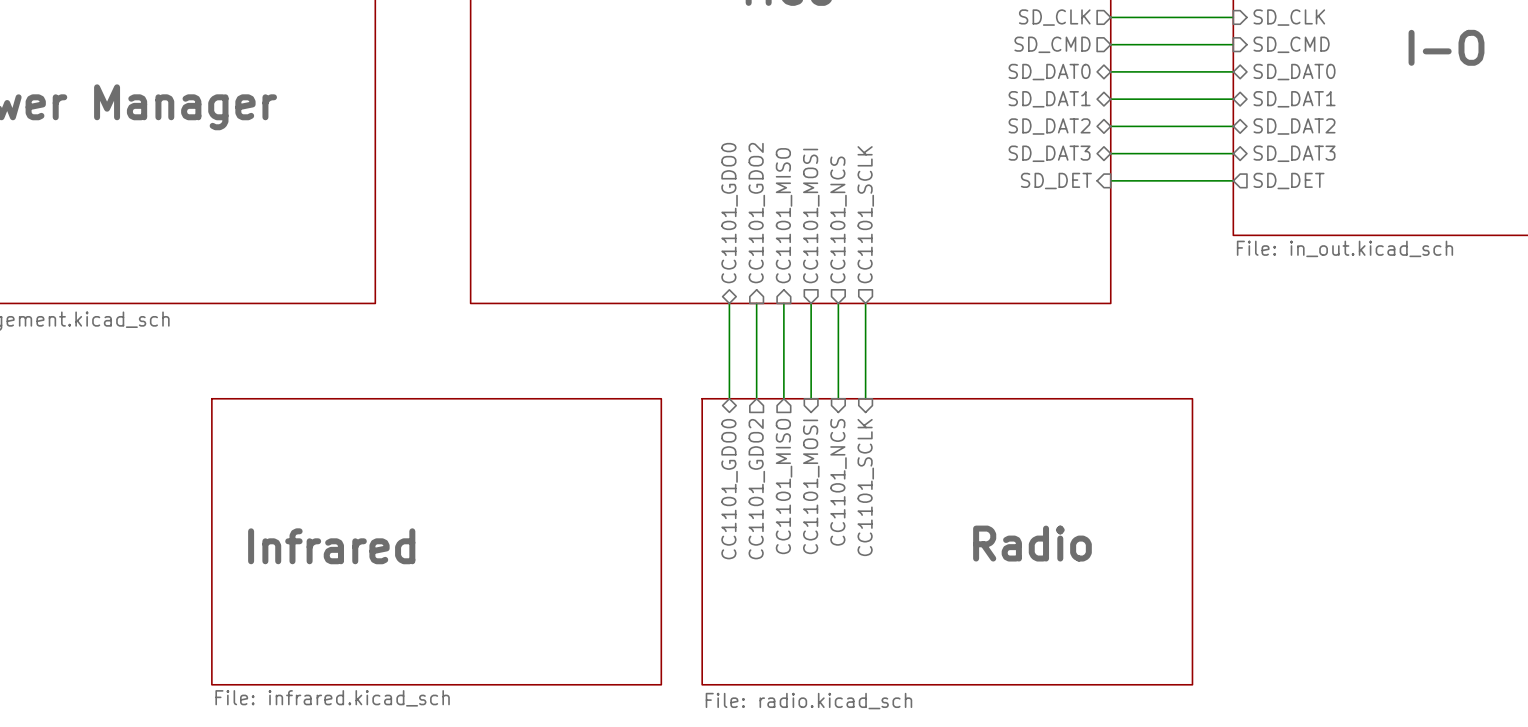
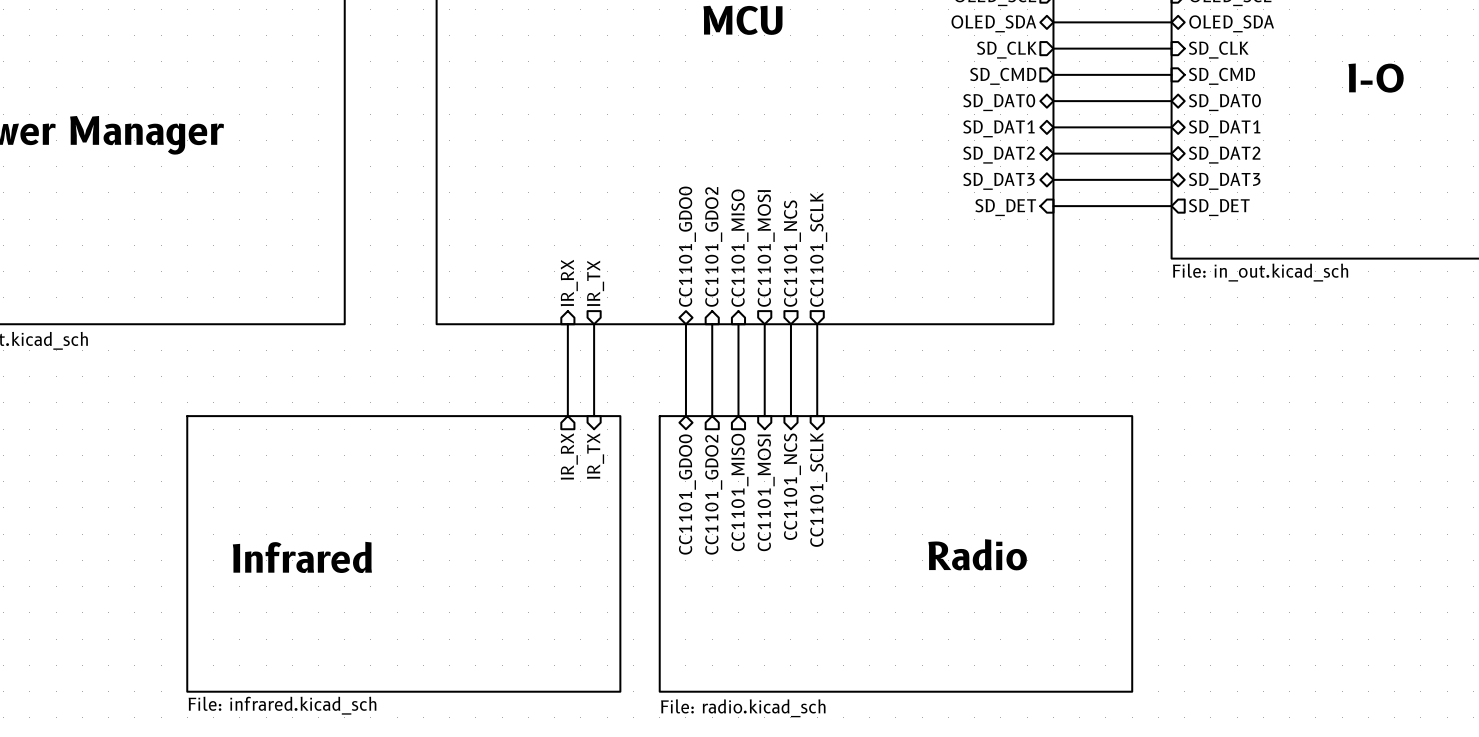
sheet pin: none -> IR_RX (569, 282)
sheet pin: none -> IR_TX (595, 283)
wire: none -> (567, 324) (567, 416)
wire: none -> (594, 324) (594, 416)
sheet pin: none -> IR_TX (595, 456)
sheet pin: none -> IR_RX (569, 456)

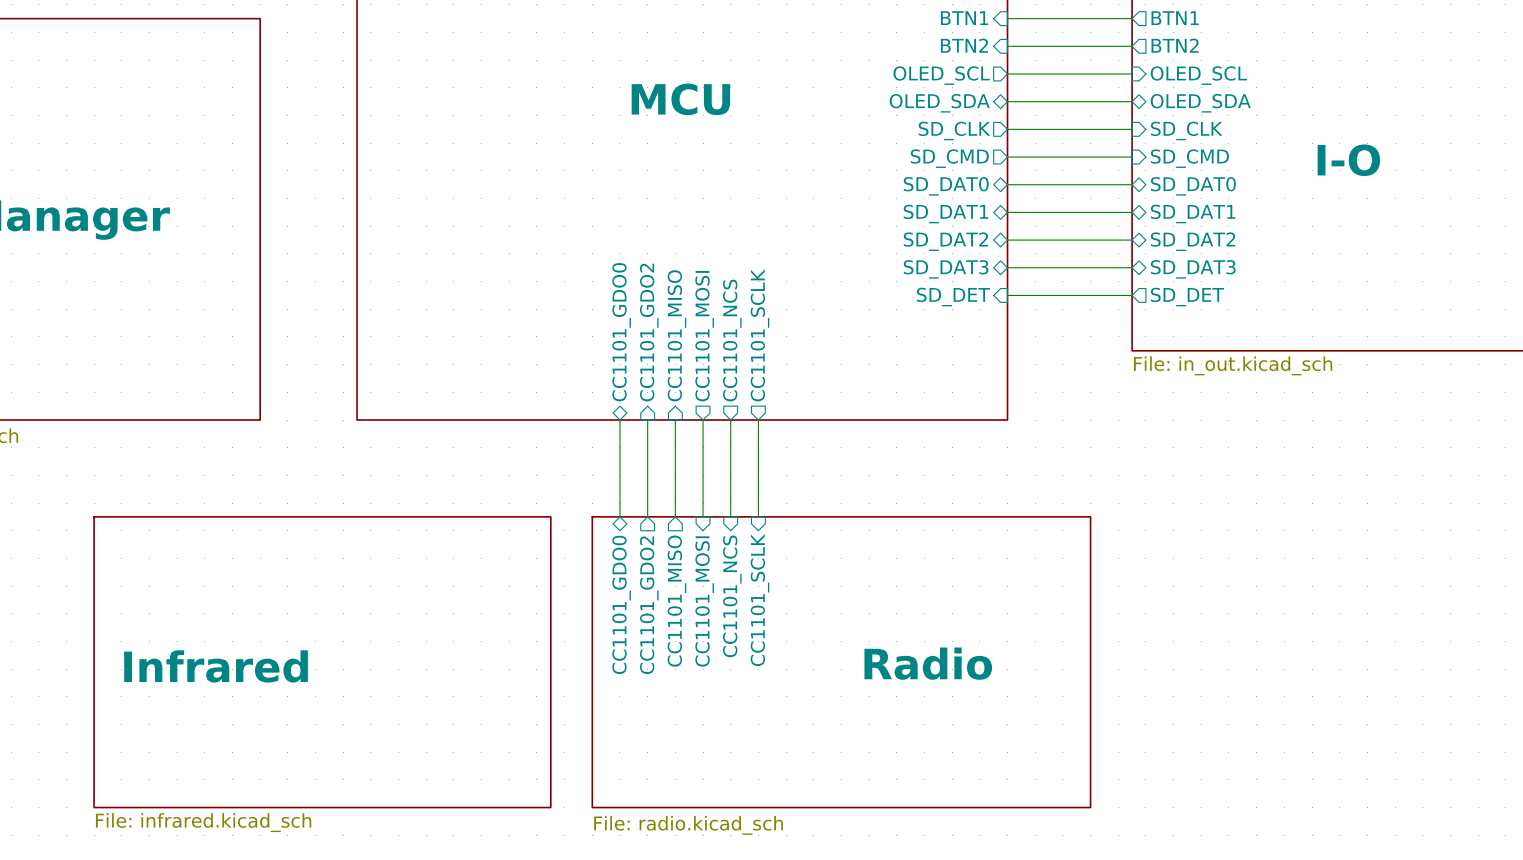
sheet pin: IR_RX (569, 282) -> none
sheet pin: IR_TX (595, 283) -> none
wire: (567, 324) (567, 416) -> none
wire: (594, 324) (594, 416) -> none
sheet pin: IR_RX (569, 456) -> none
sheet pin: IR_TX (595, 456) -> none

